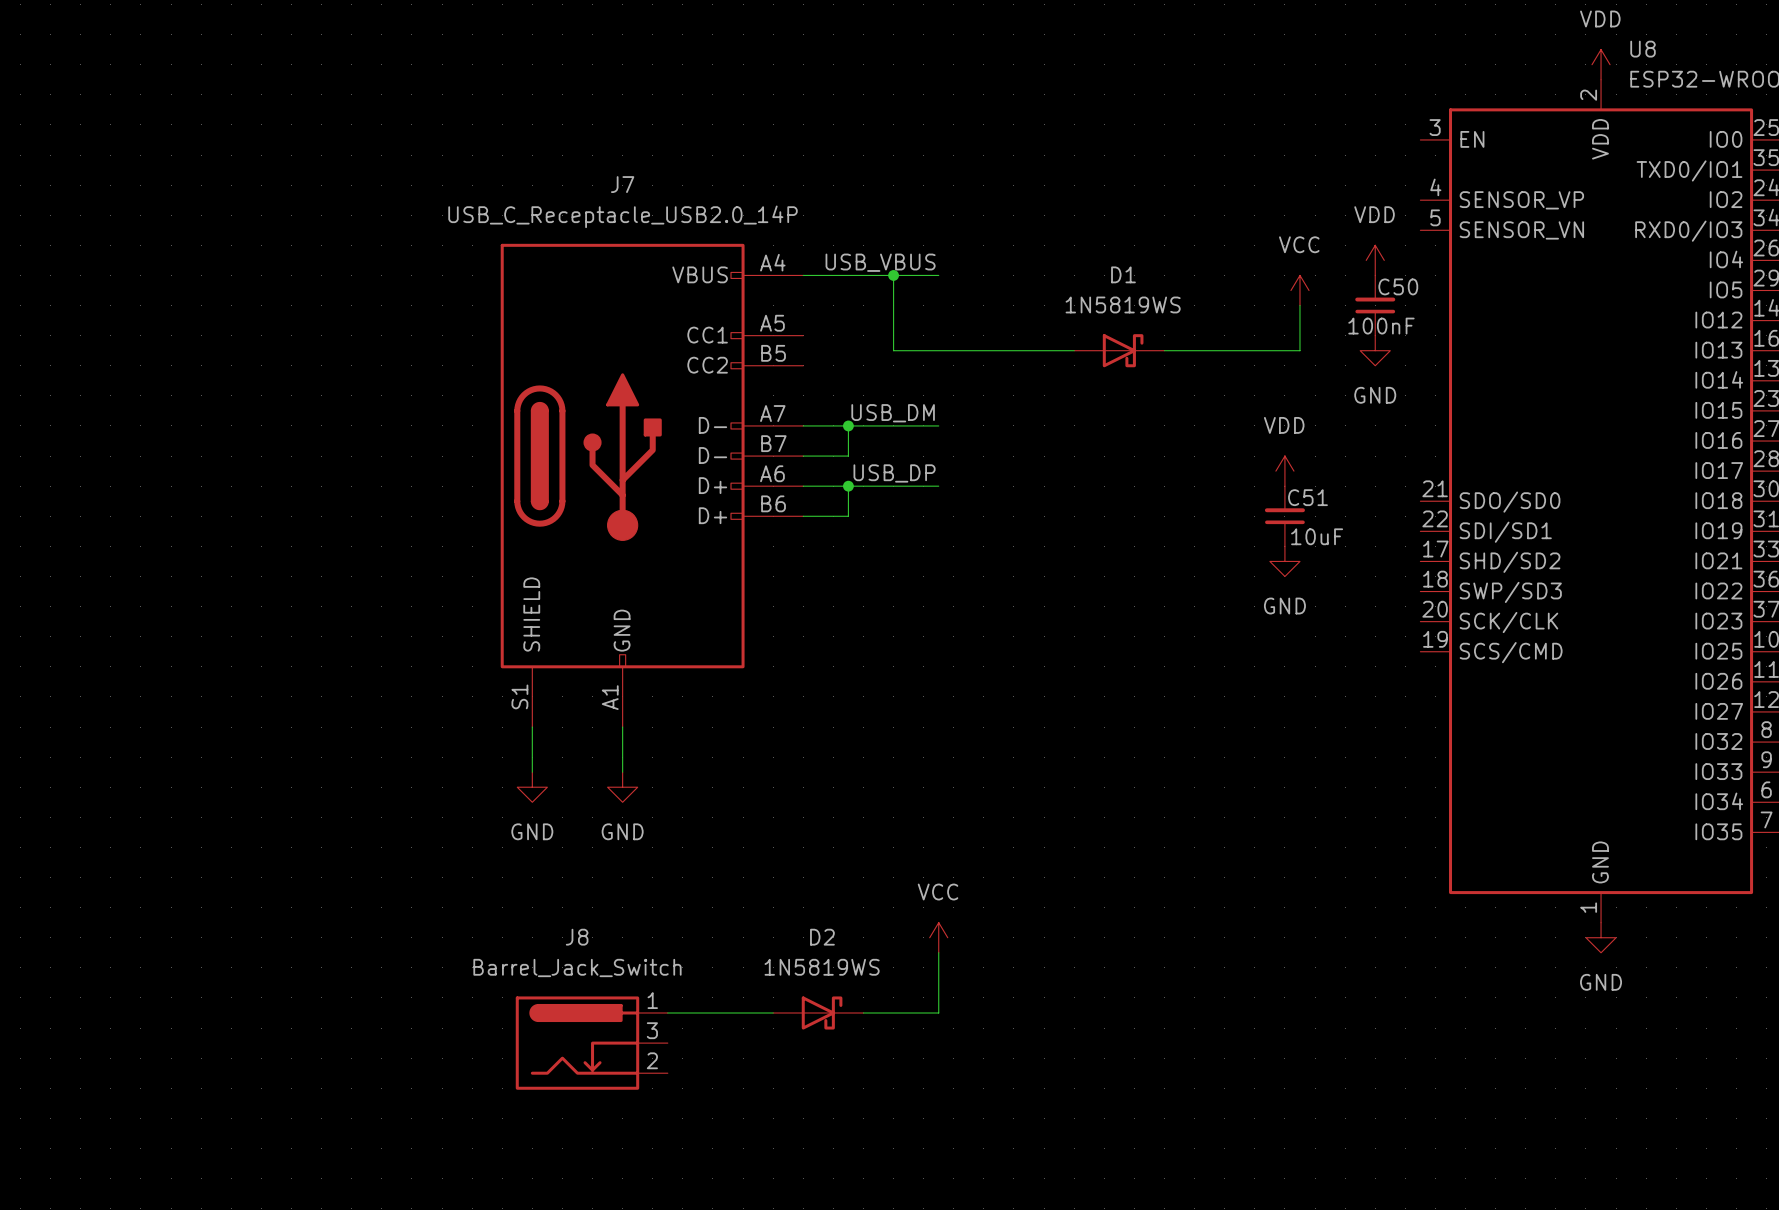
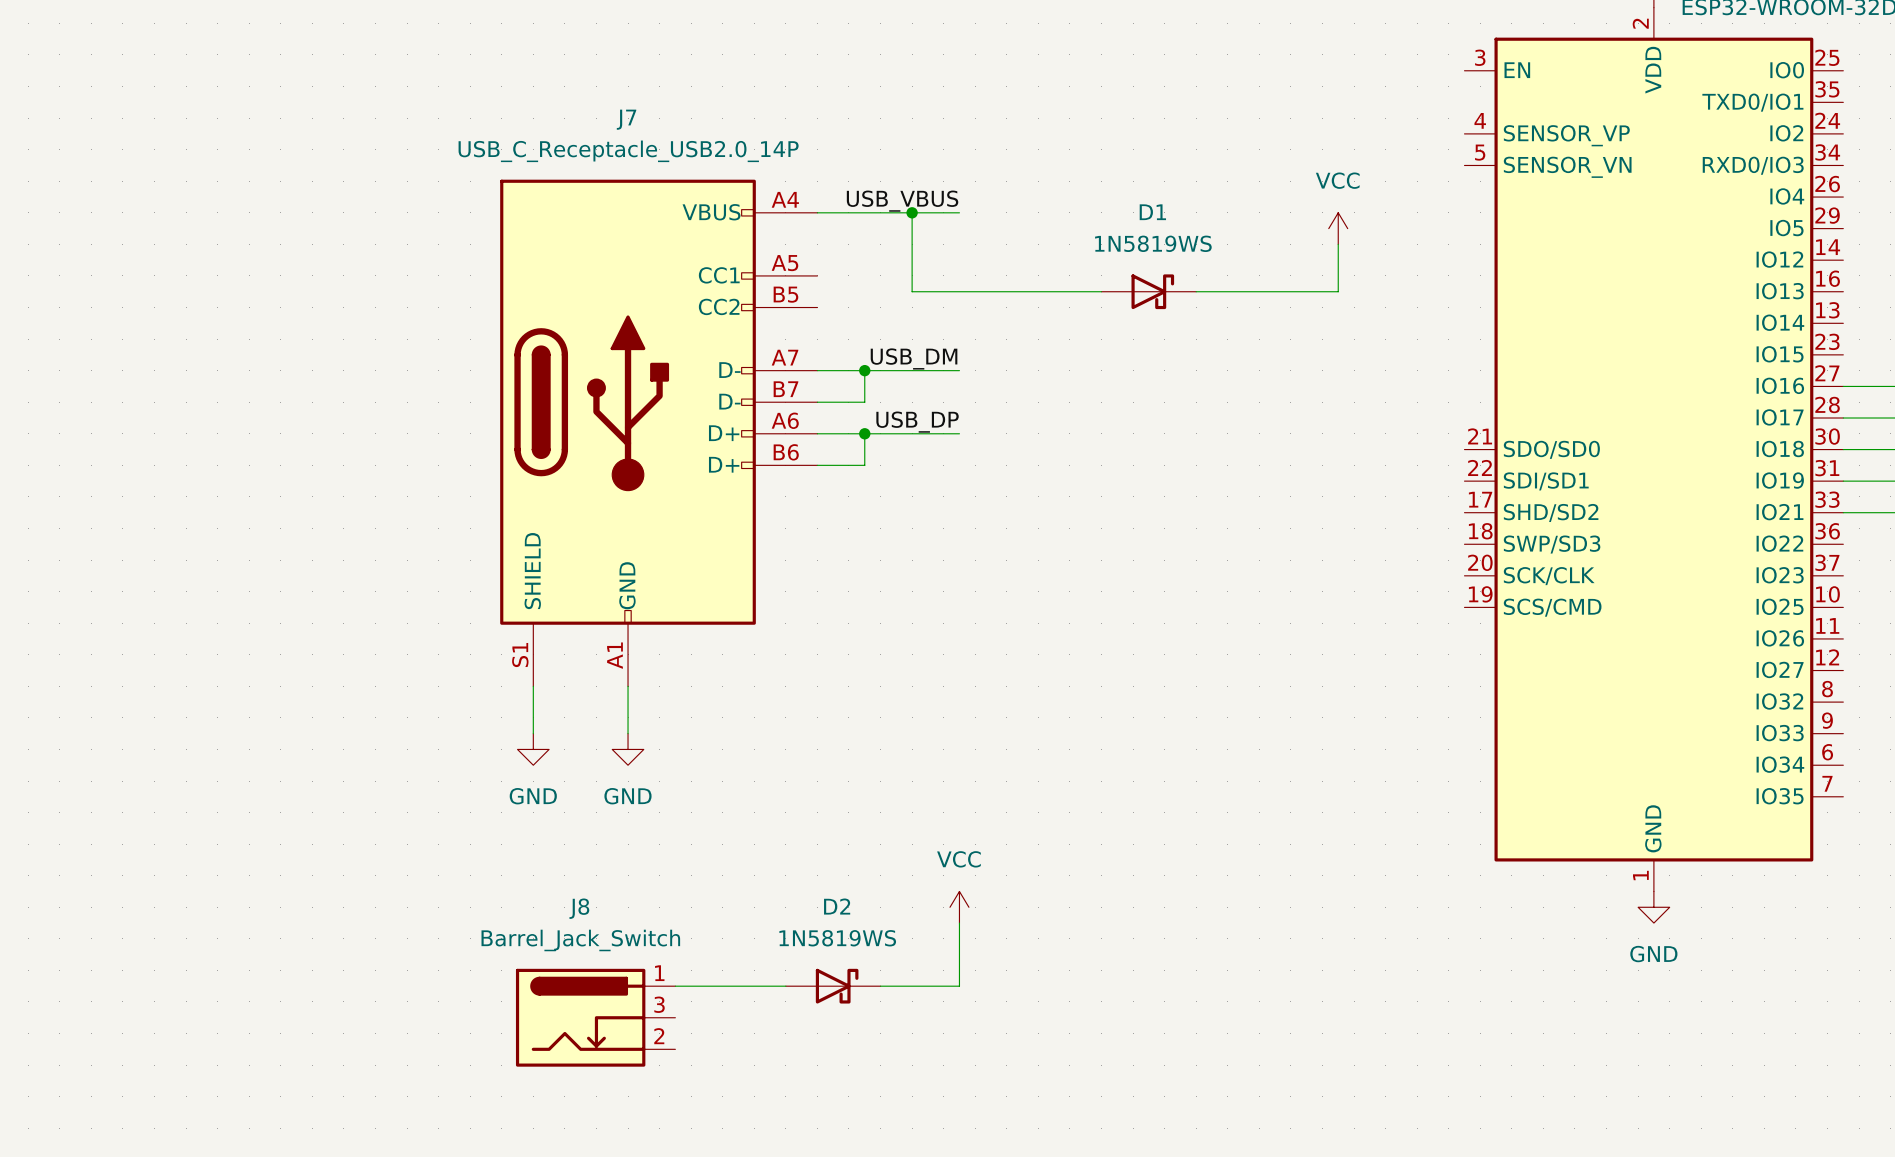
power symbol: VDD (1375, 260) -> none
C50: 100nF (1375, 305) -> none
power symbol: GND (1375, 350) -> none
power symbol: VDD (1284, 471) -> none
C51: 10uF (1284, 516) -> none
power symbol: GND (1284, 561) -> none

